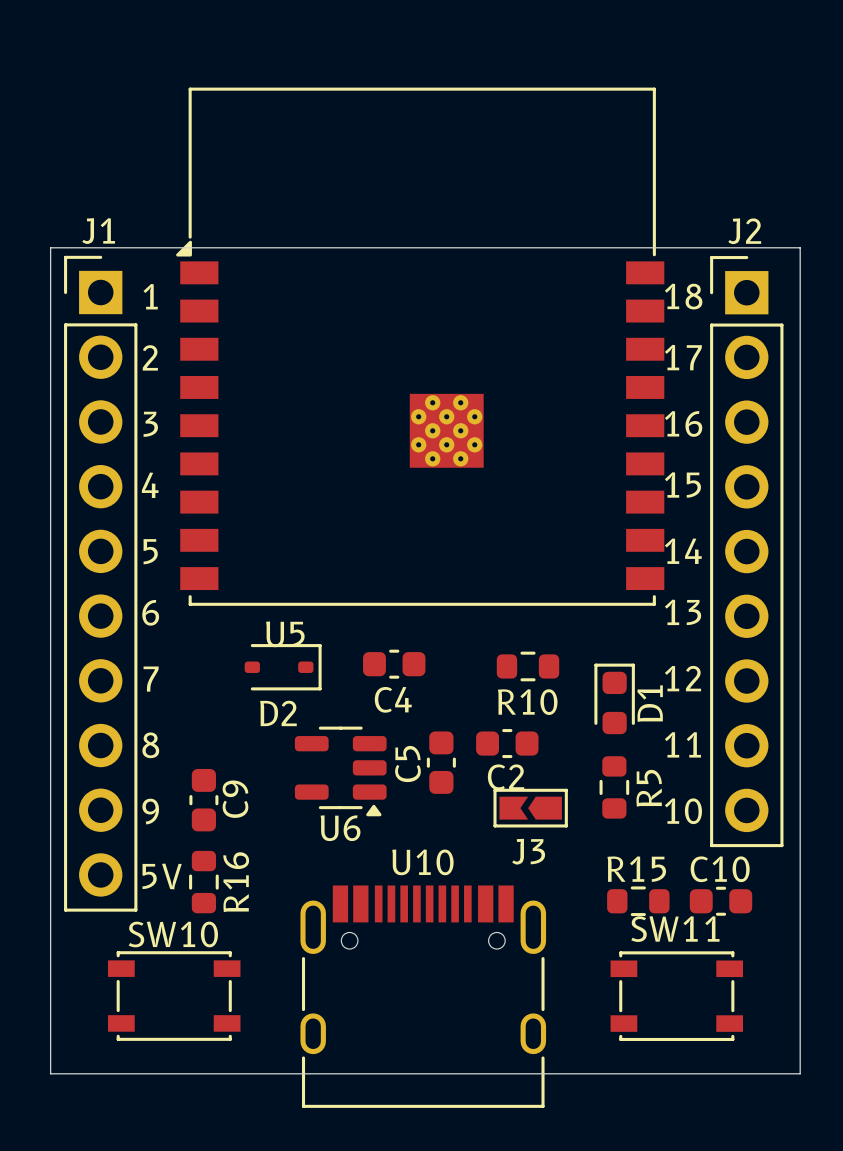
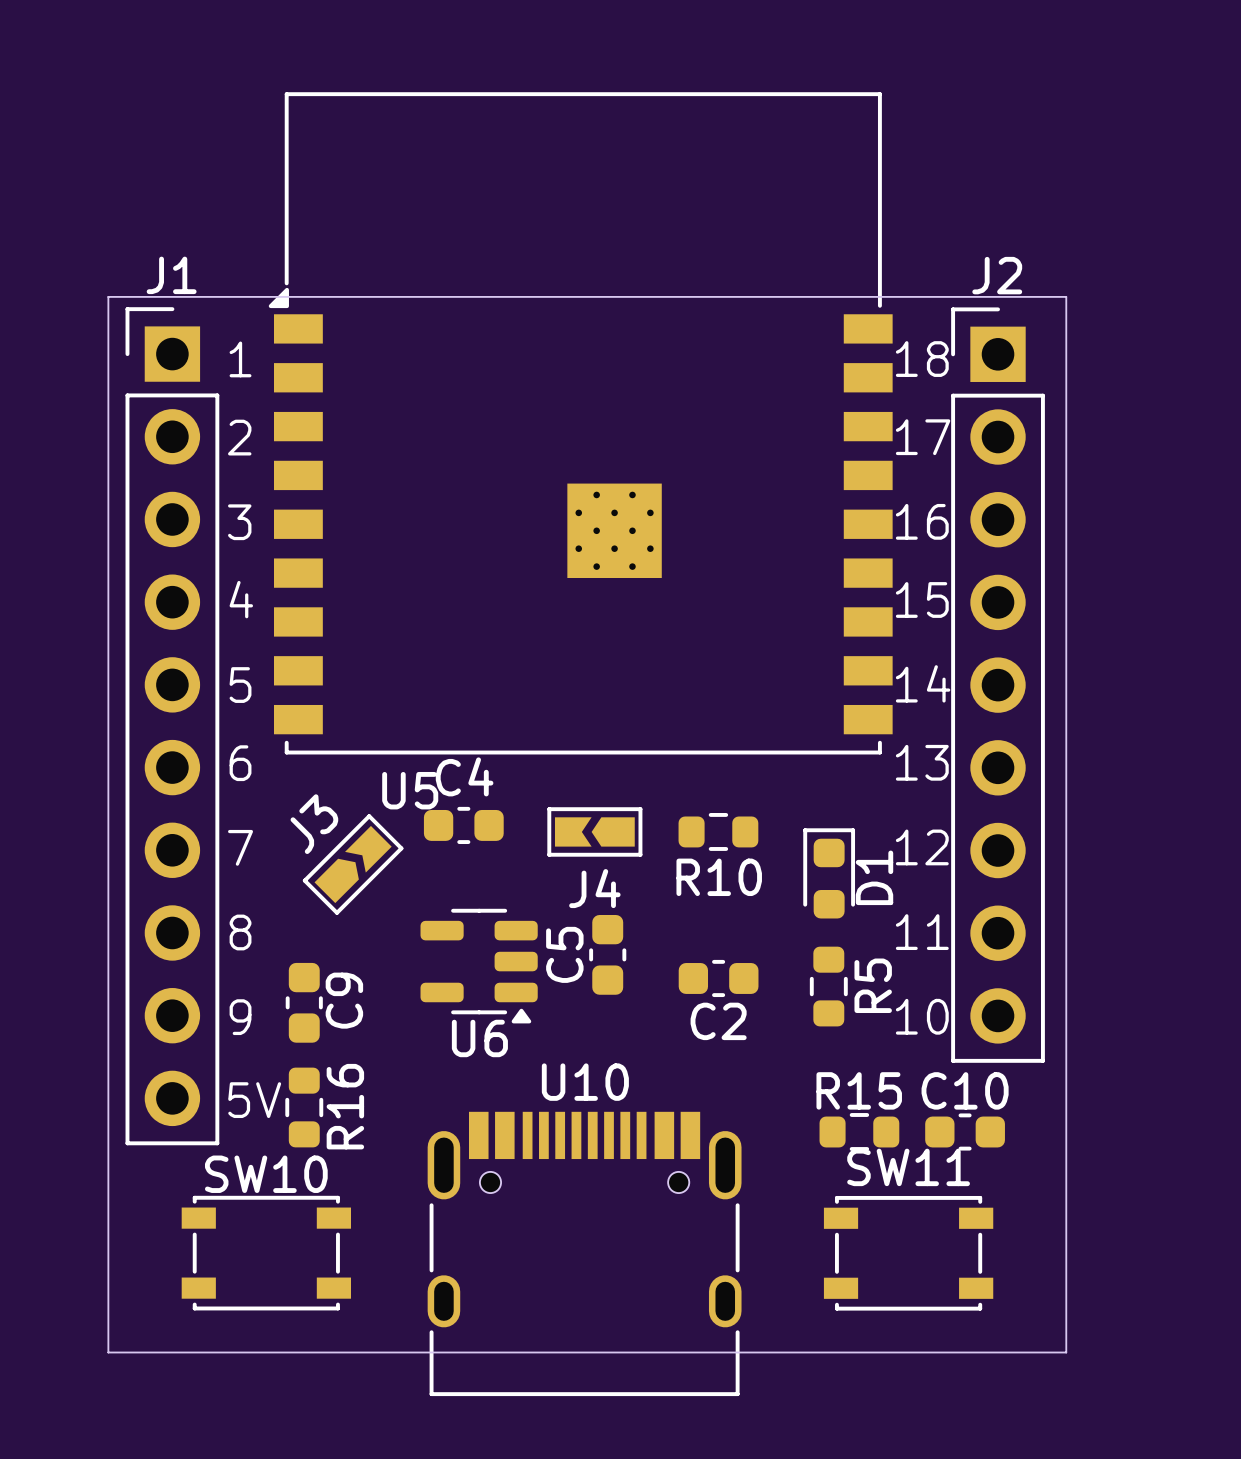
C4 position: (394, 664) -> (463, 825)
J4: none -> (594, 831)
D2: (283, 667) -> none
C4 name position: C4 (393, 699) -> C4 (464, 776)
C2 position: (507, 743) -> (718, 978)
J3 rotation: 0° (530, 808) -> 135° clockwise (353, 864)
J3 position: (530, 808) -> (353, 864)

